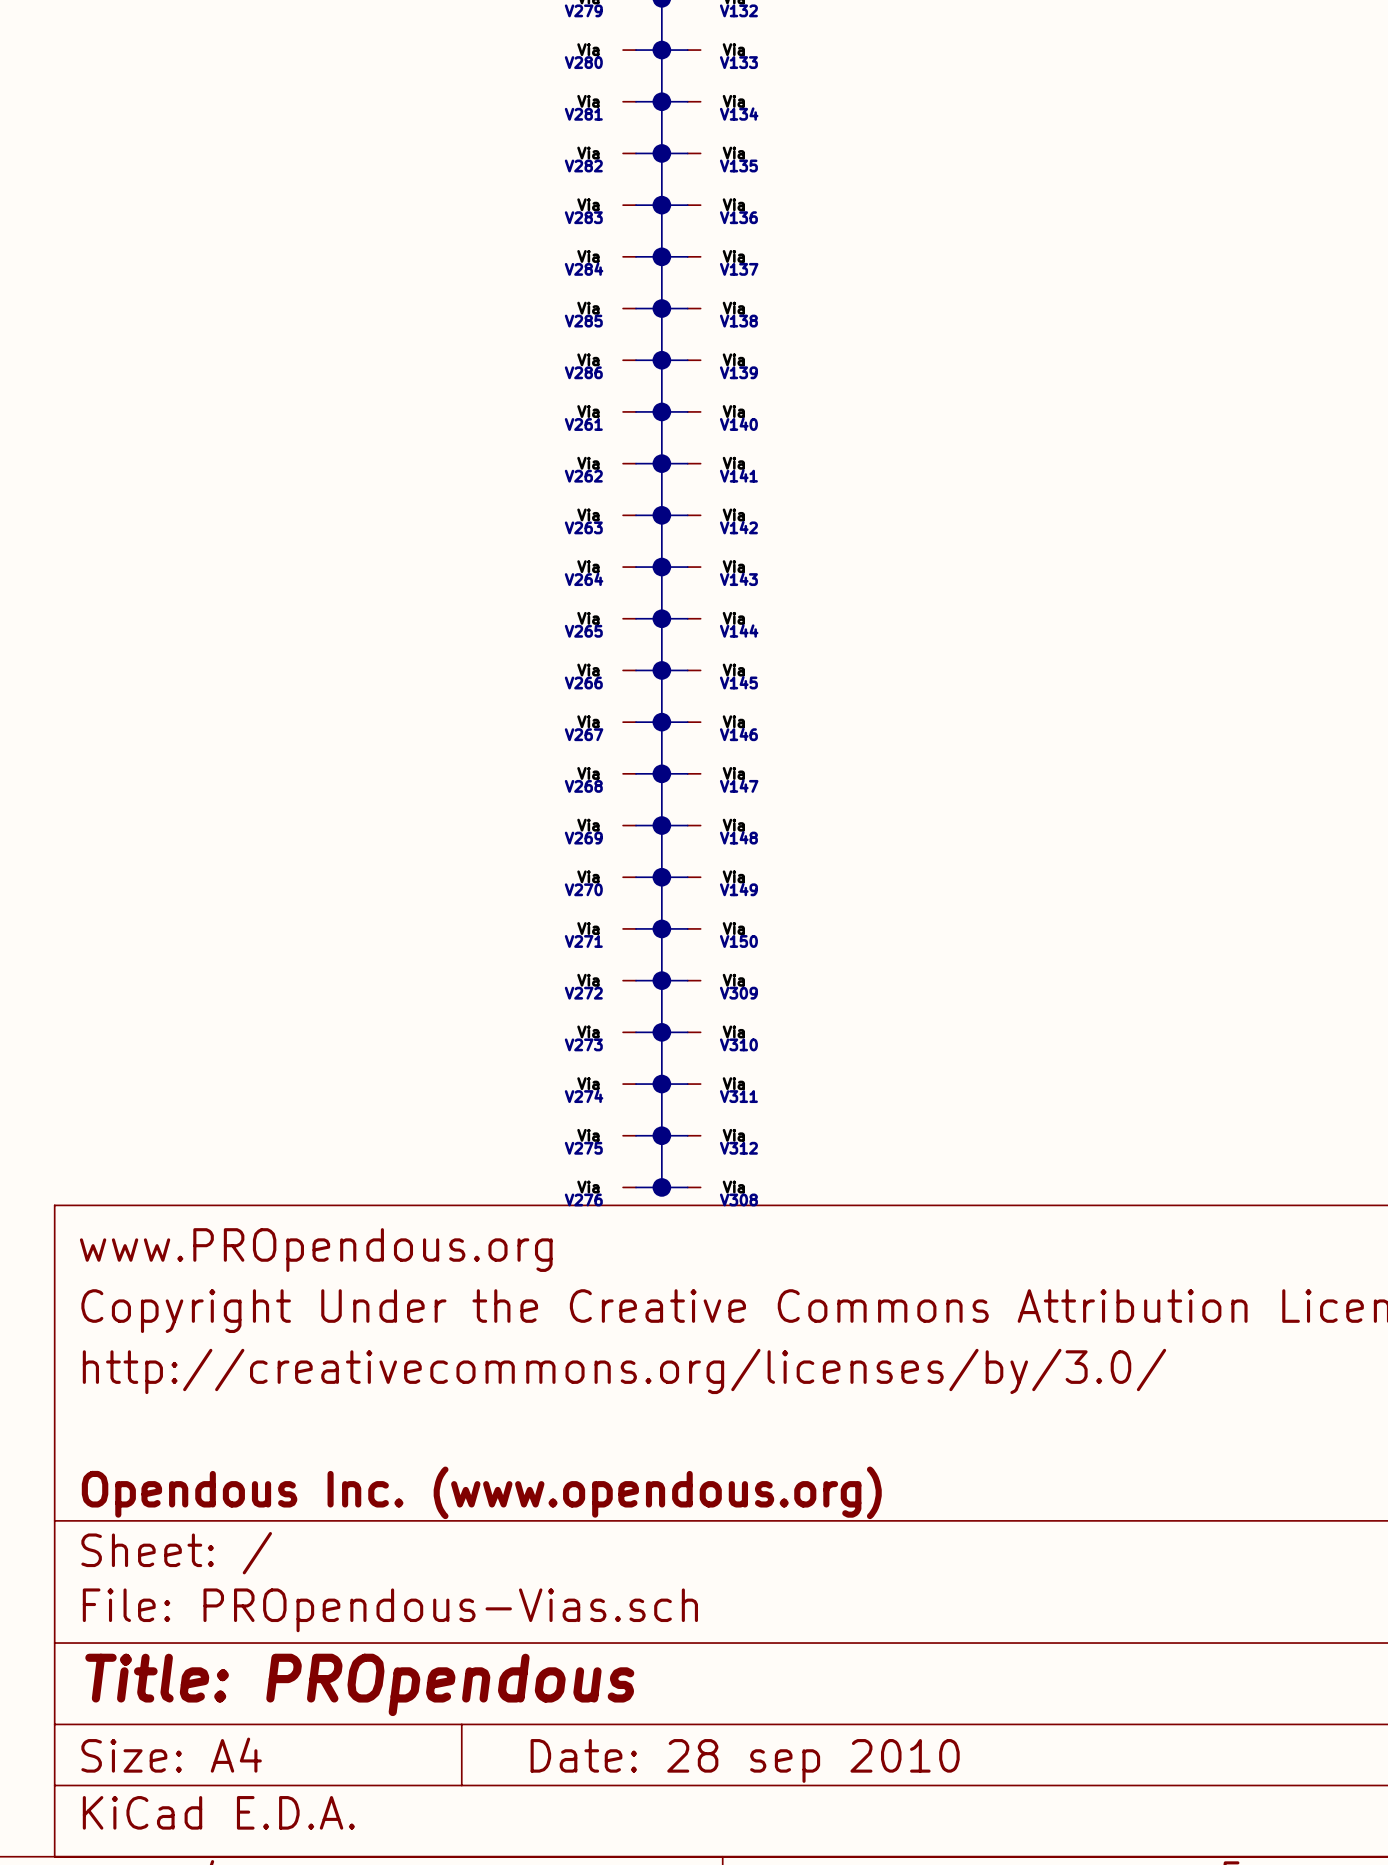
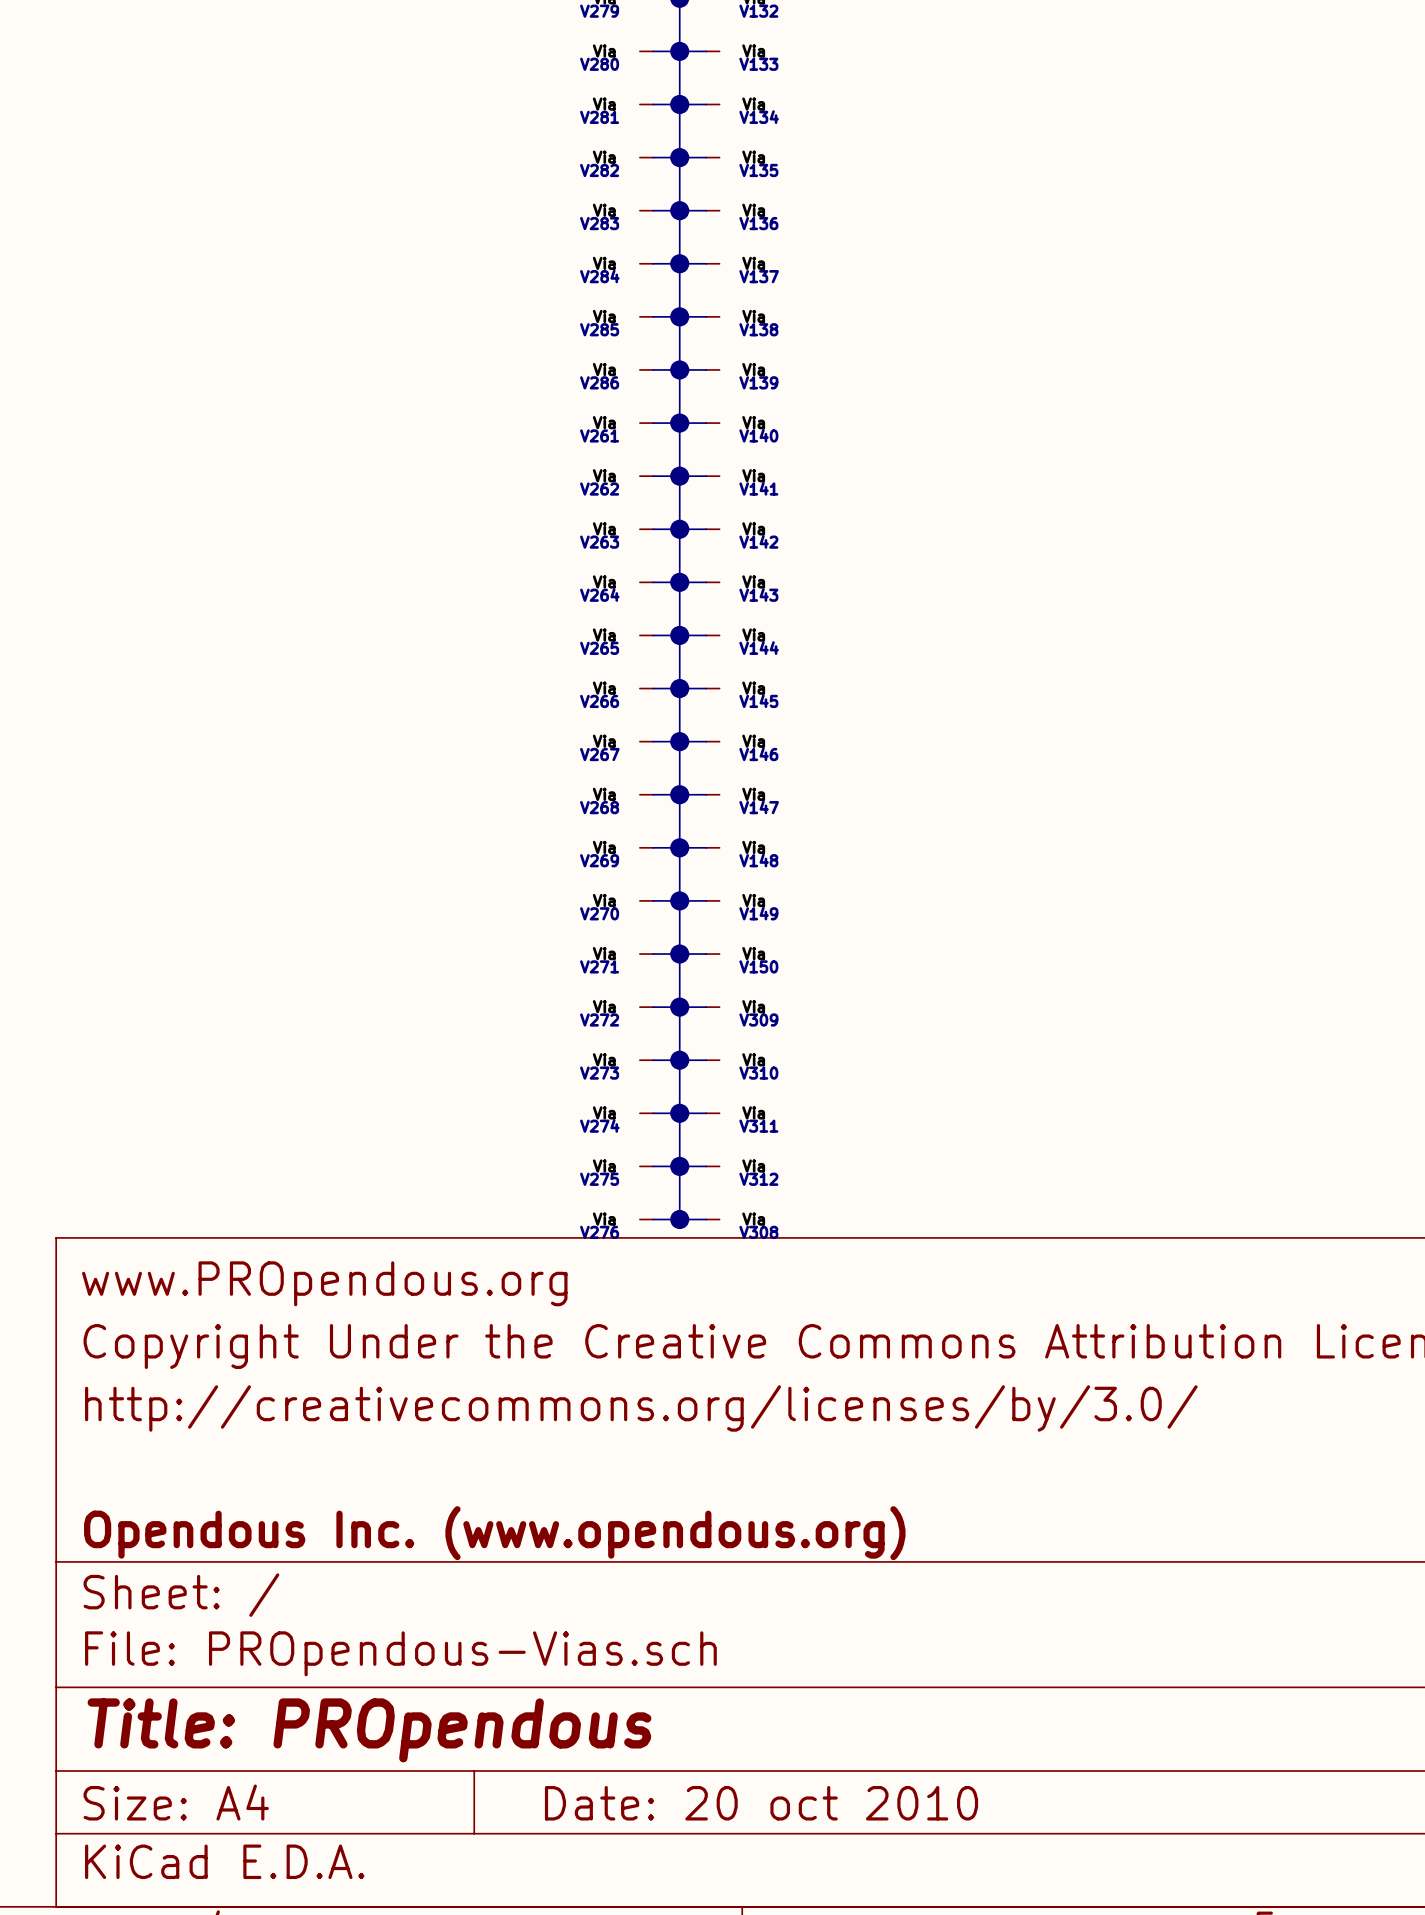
title block: Date: 28 sep 2010 (745, 1760) -> Date: 20 oct 2010 (761, 1803)

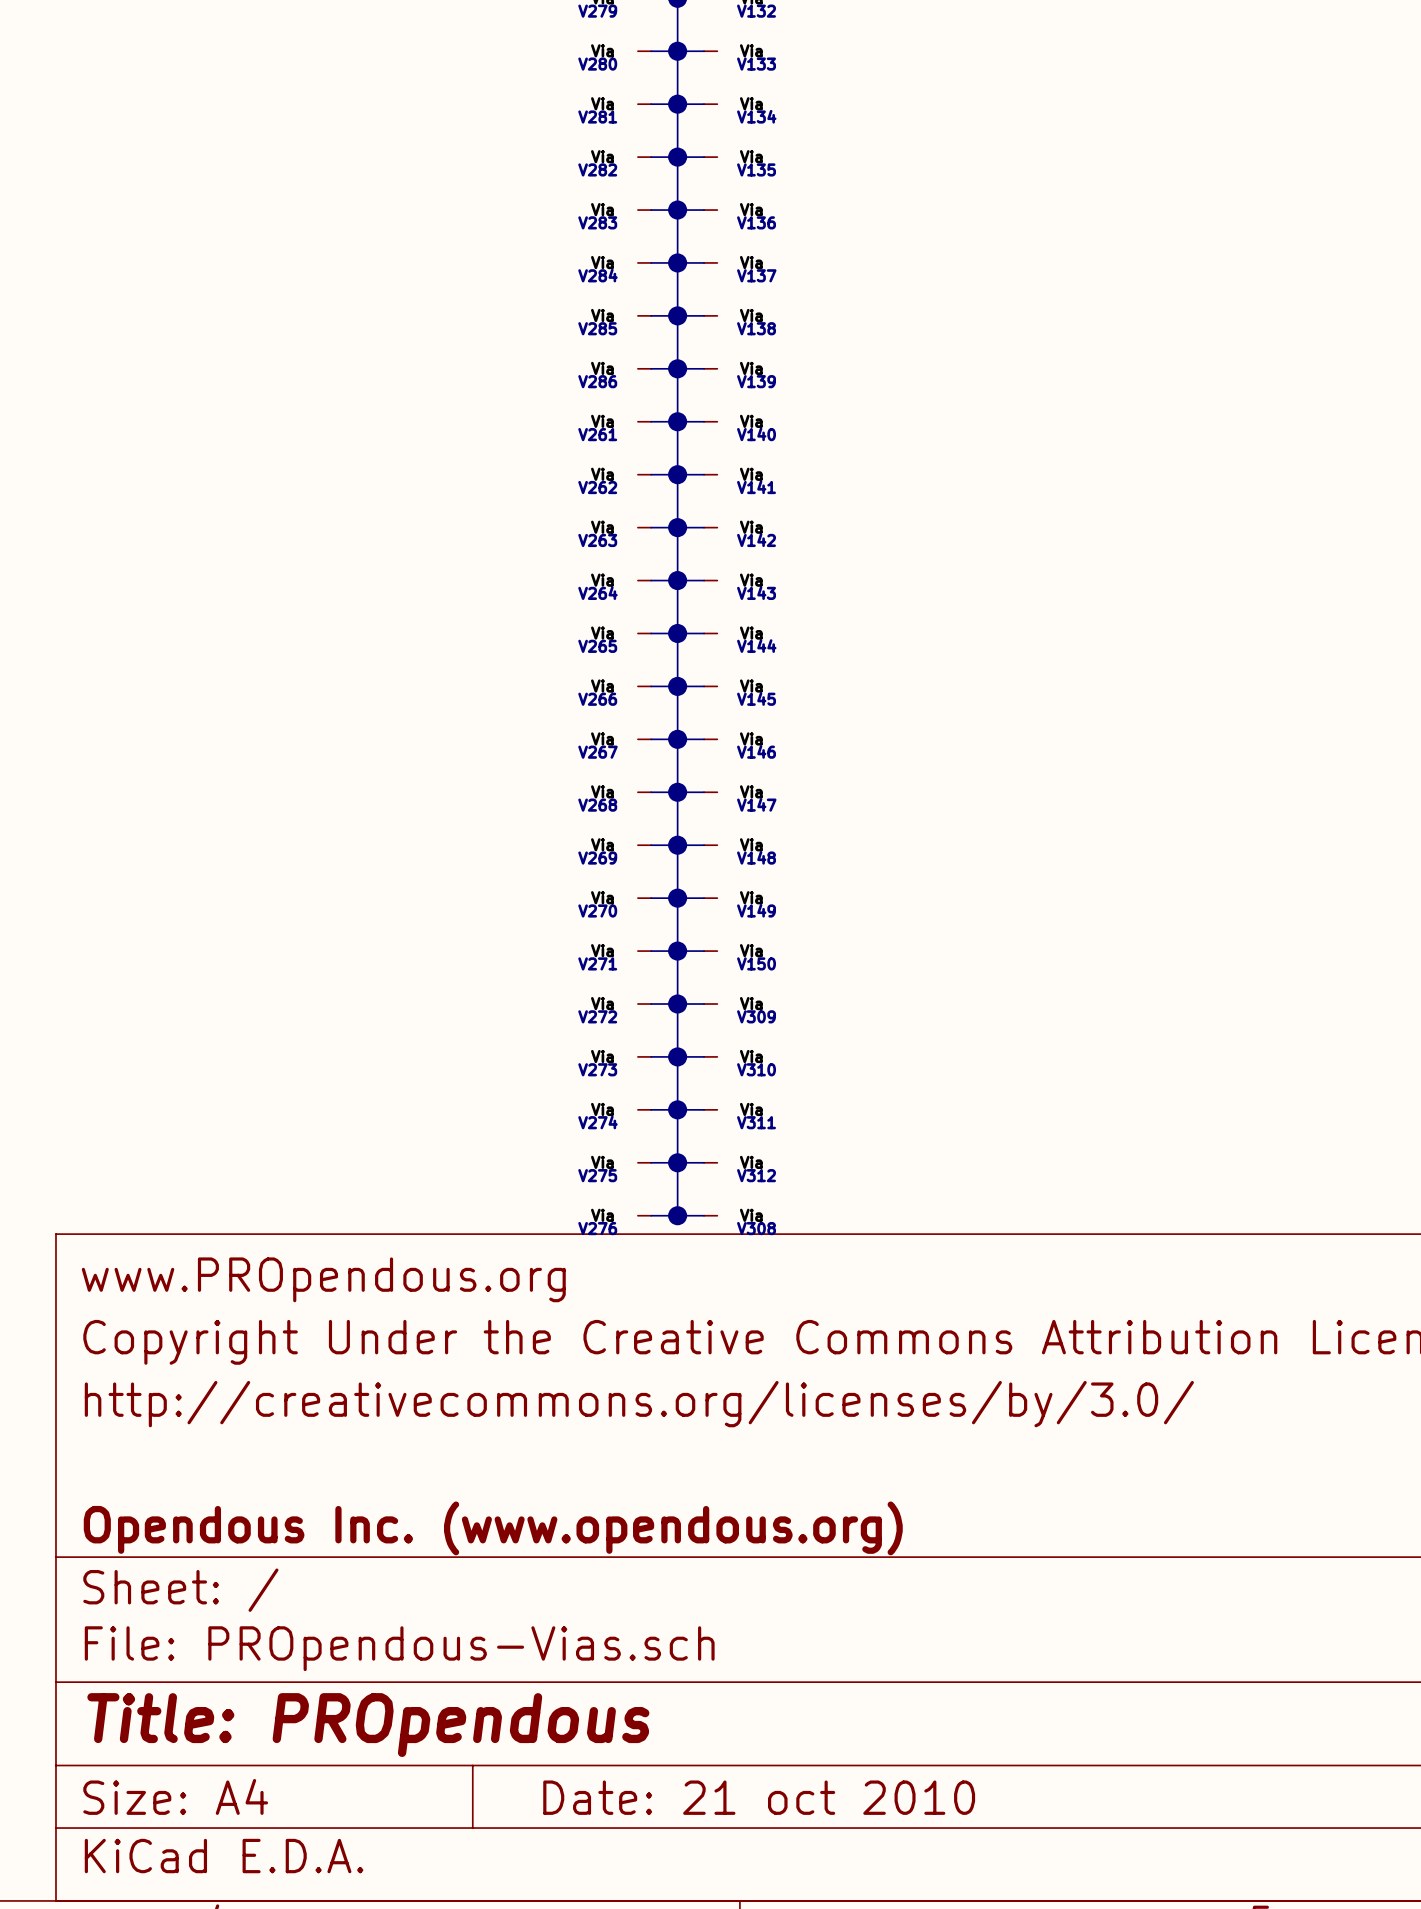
title block: Date: 20 oct 2010 (761, 1803) -> Date: 21 oct 2010 (759, 1797)

